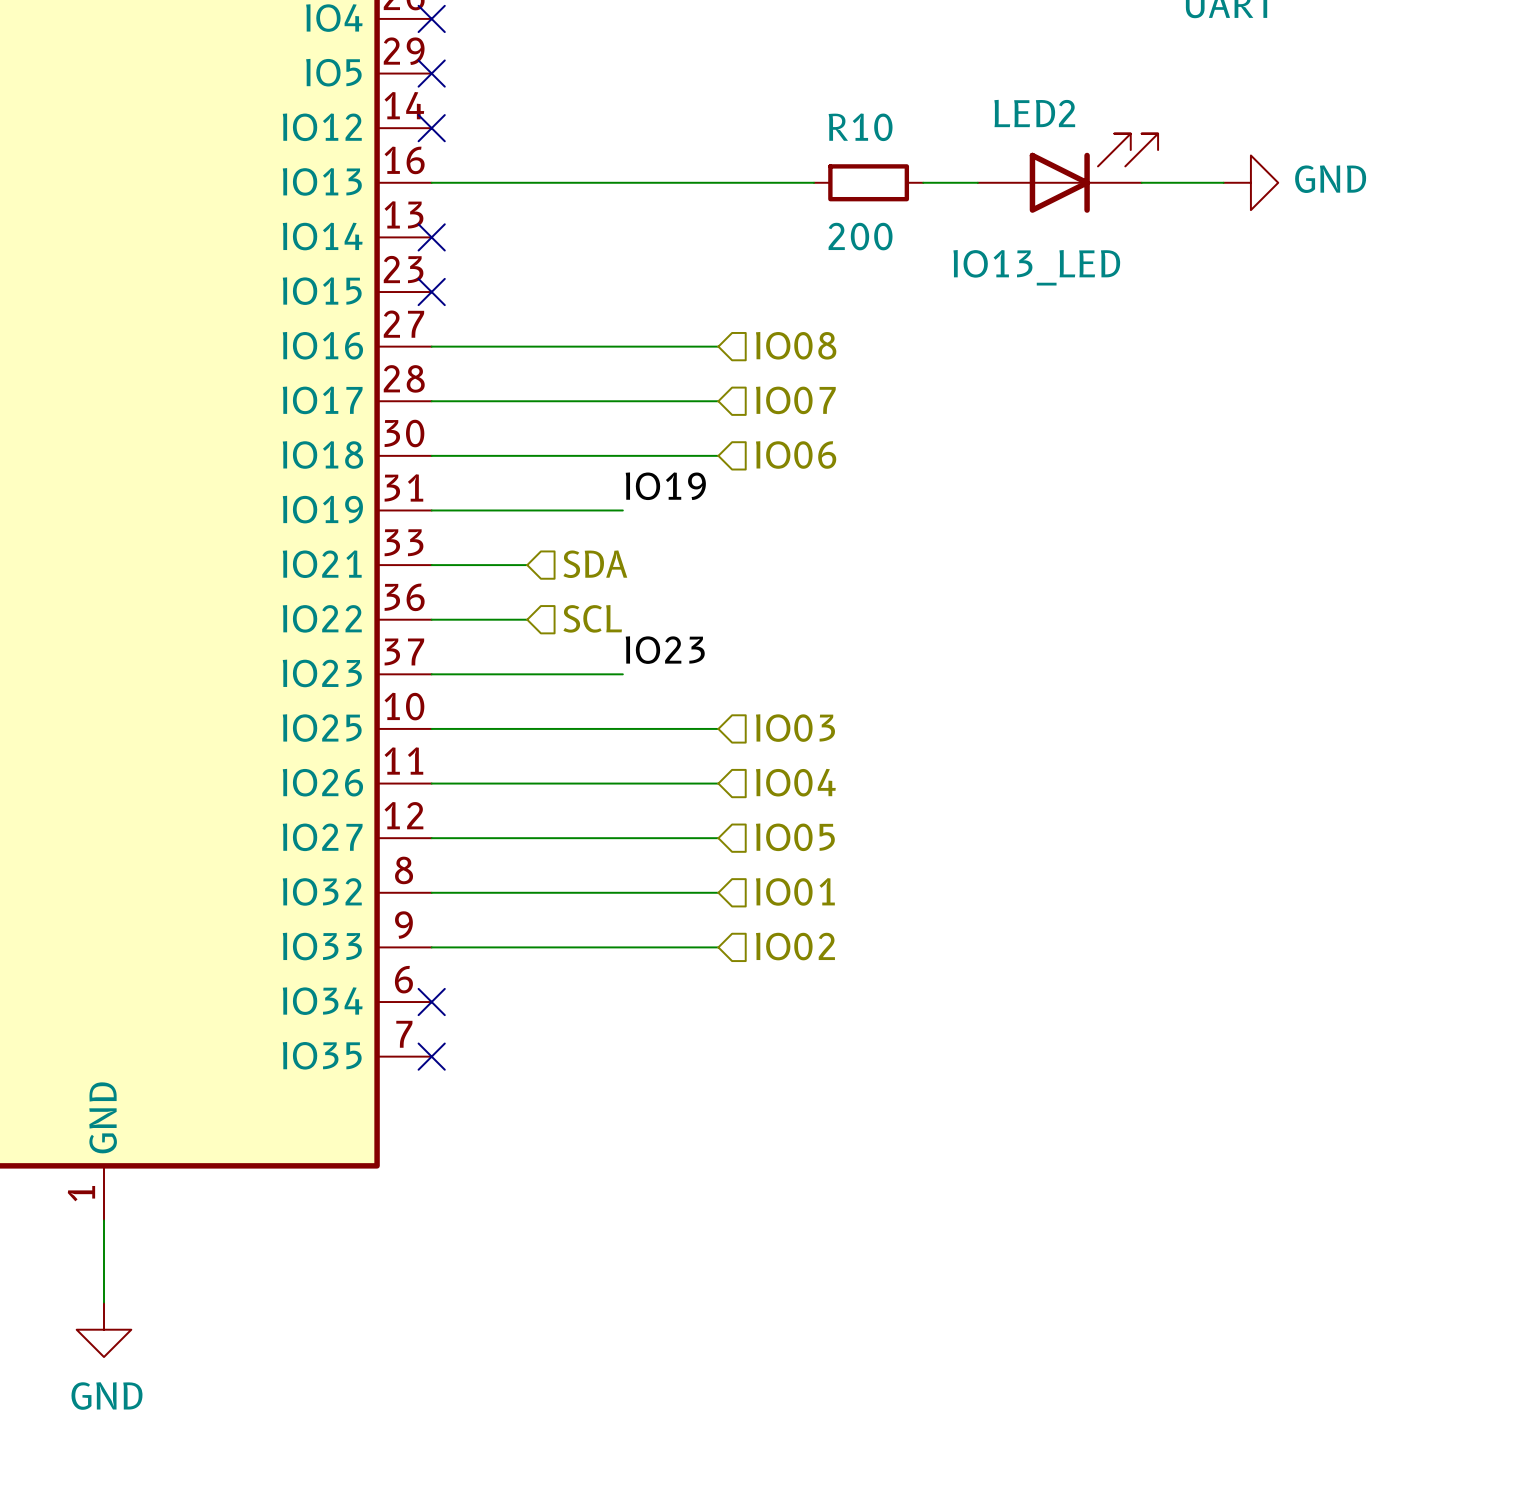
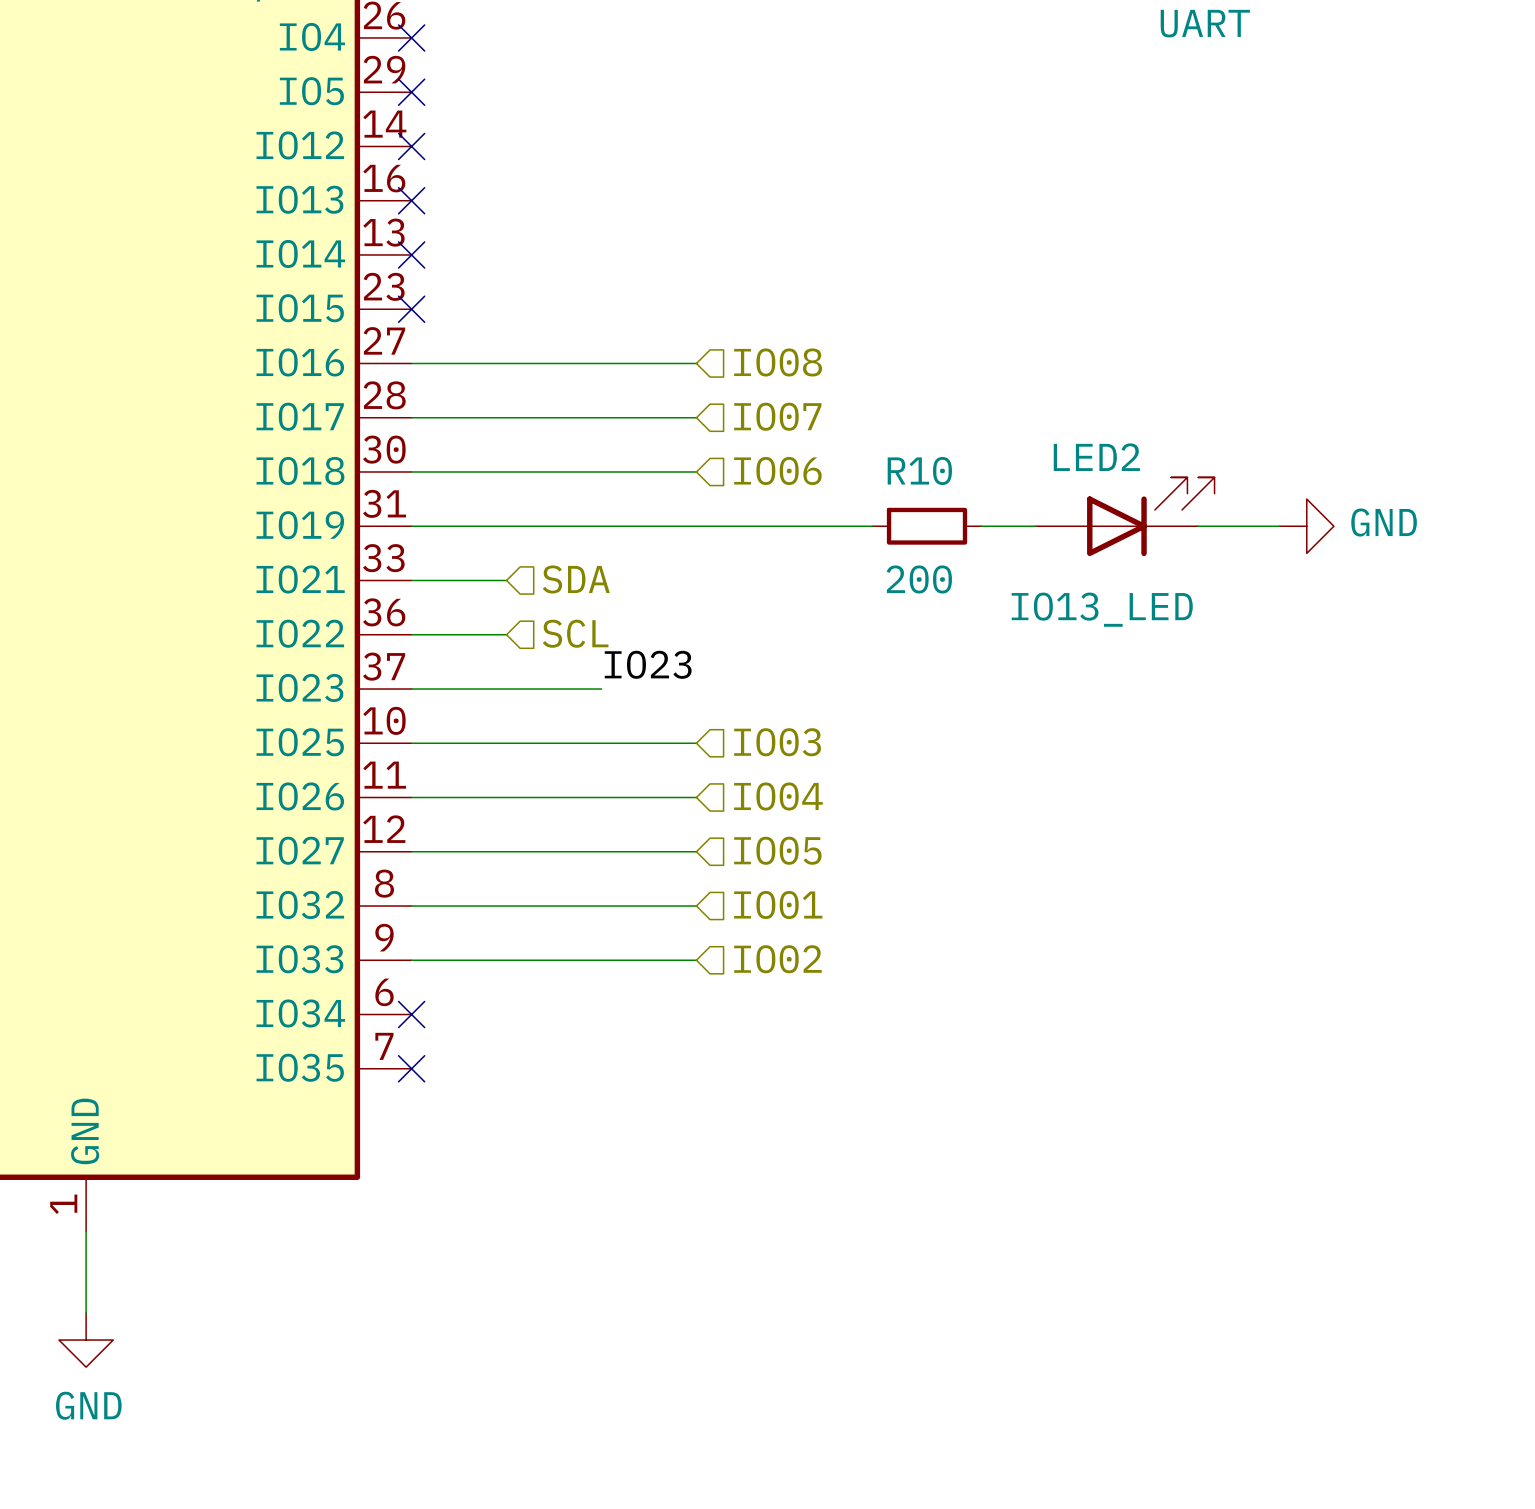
LED2 position: (1067, 173) -> (1125, 516)
wire: (431, 182) (814, 182) -> none
no-connect mark: none -> (411, 200)
R10 position: (868, 182) -> (927, 526)
wire: (923, 182) (977, 182) -> (981, 526) (1035, 526)
wire: (1141, 182) (1223, 182) -> (1198, 526) (1279, 526)
power symbol position: GND (1250, 182) -> GND (1306, 526)
label: IO19 (665, 486) -> none
wire: none -> (601, 526) (872, 526)

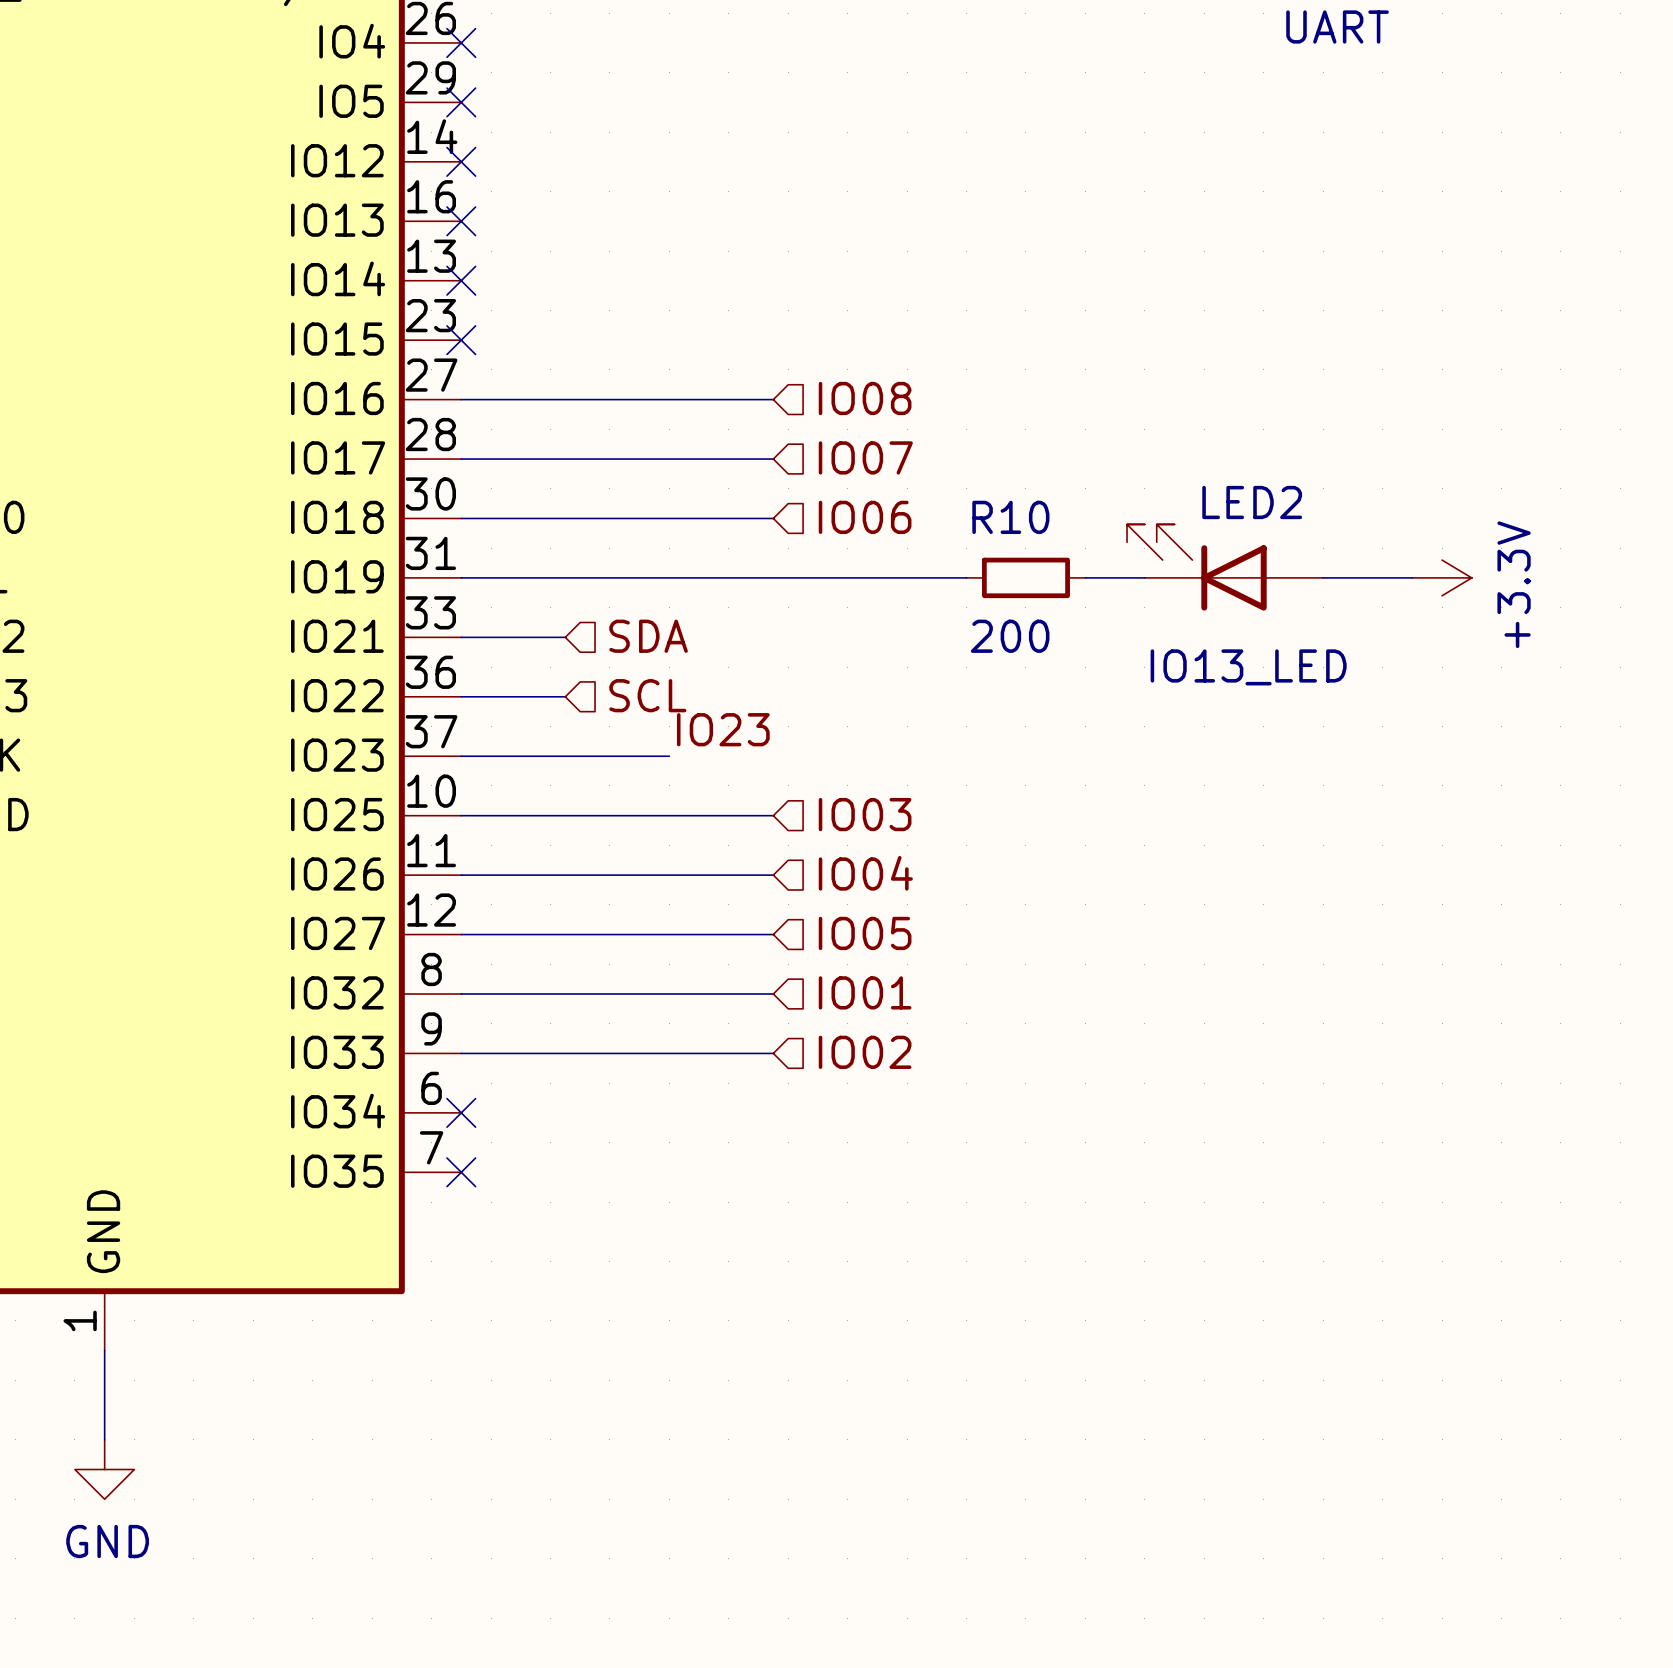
LED2 flip: as is (1150, 516) -> left-right (1196, 567)
power symbol: GND (1306, 526) -> +3.3V (1442, 577)

